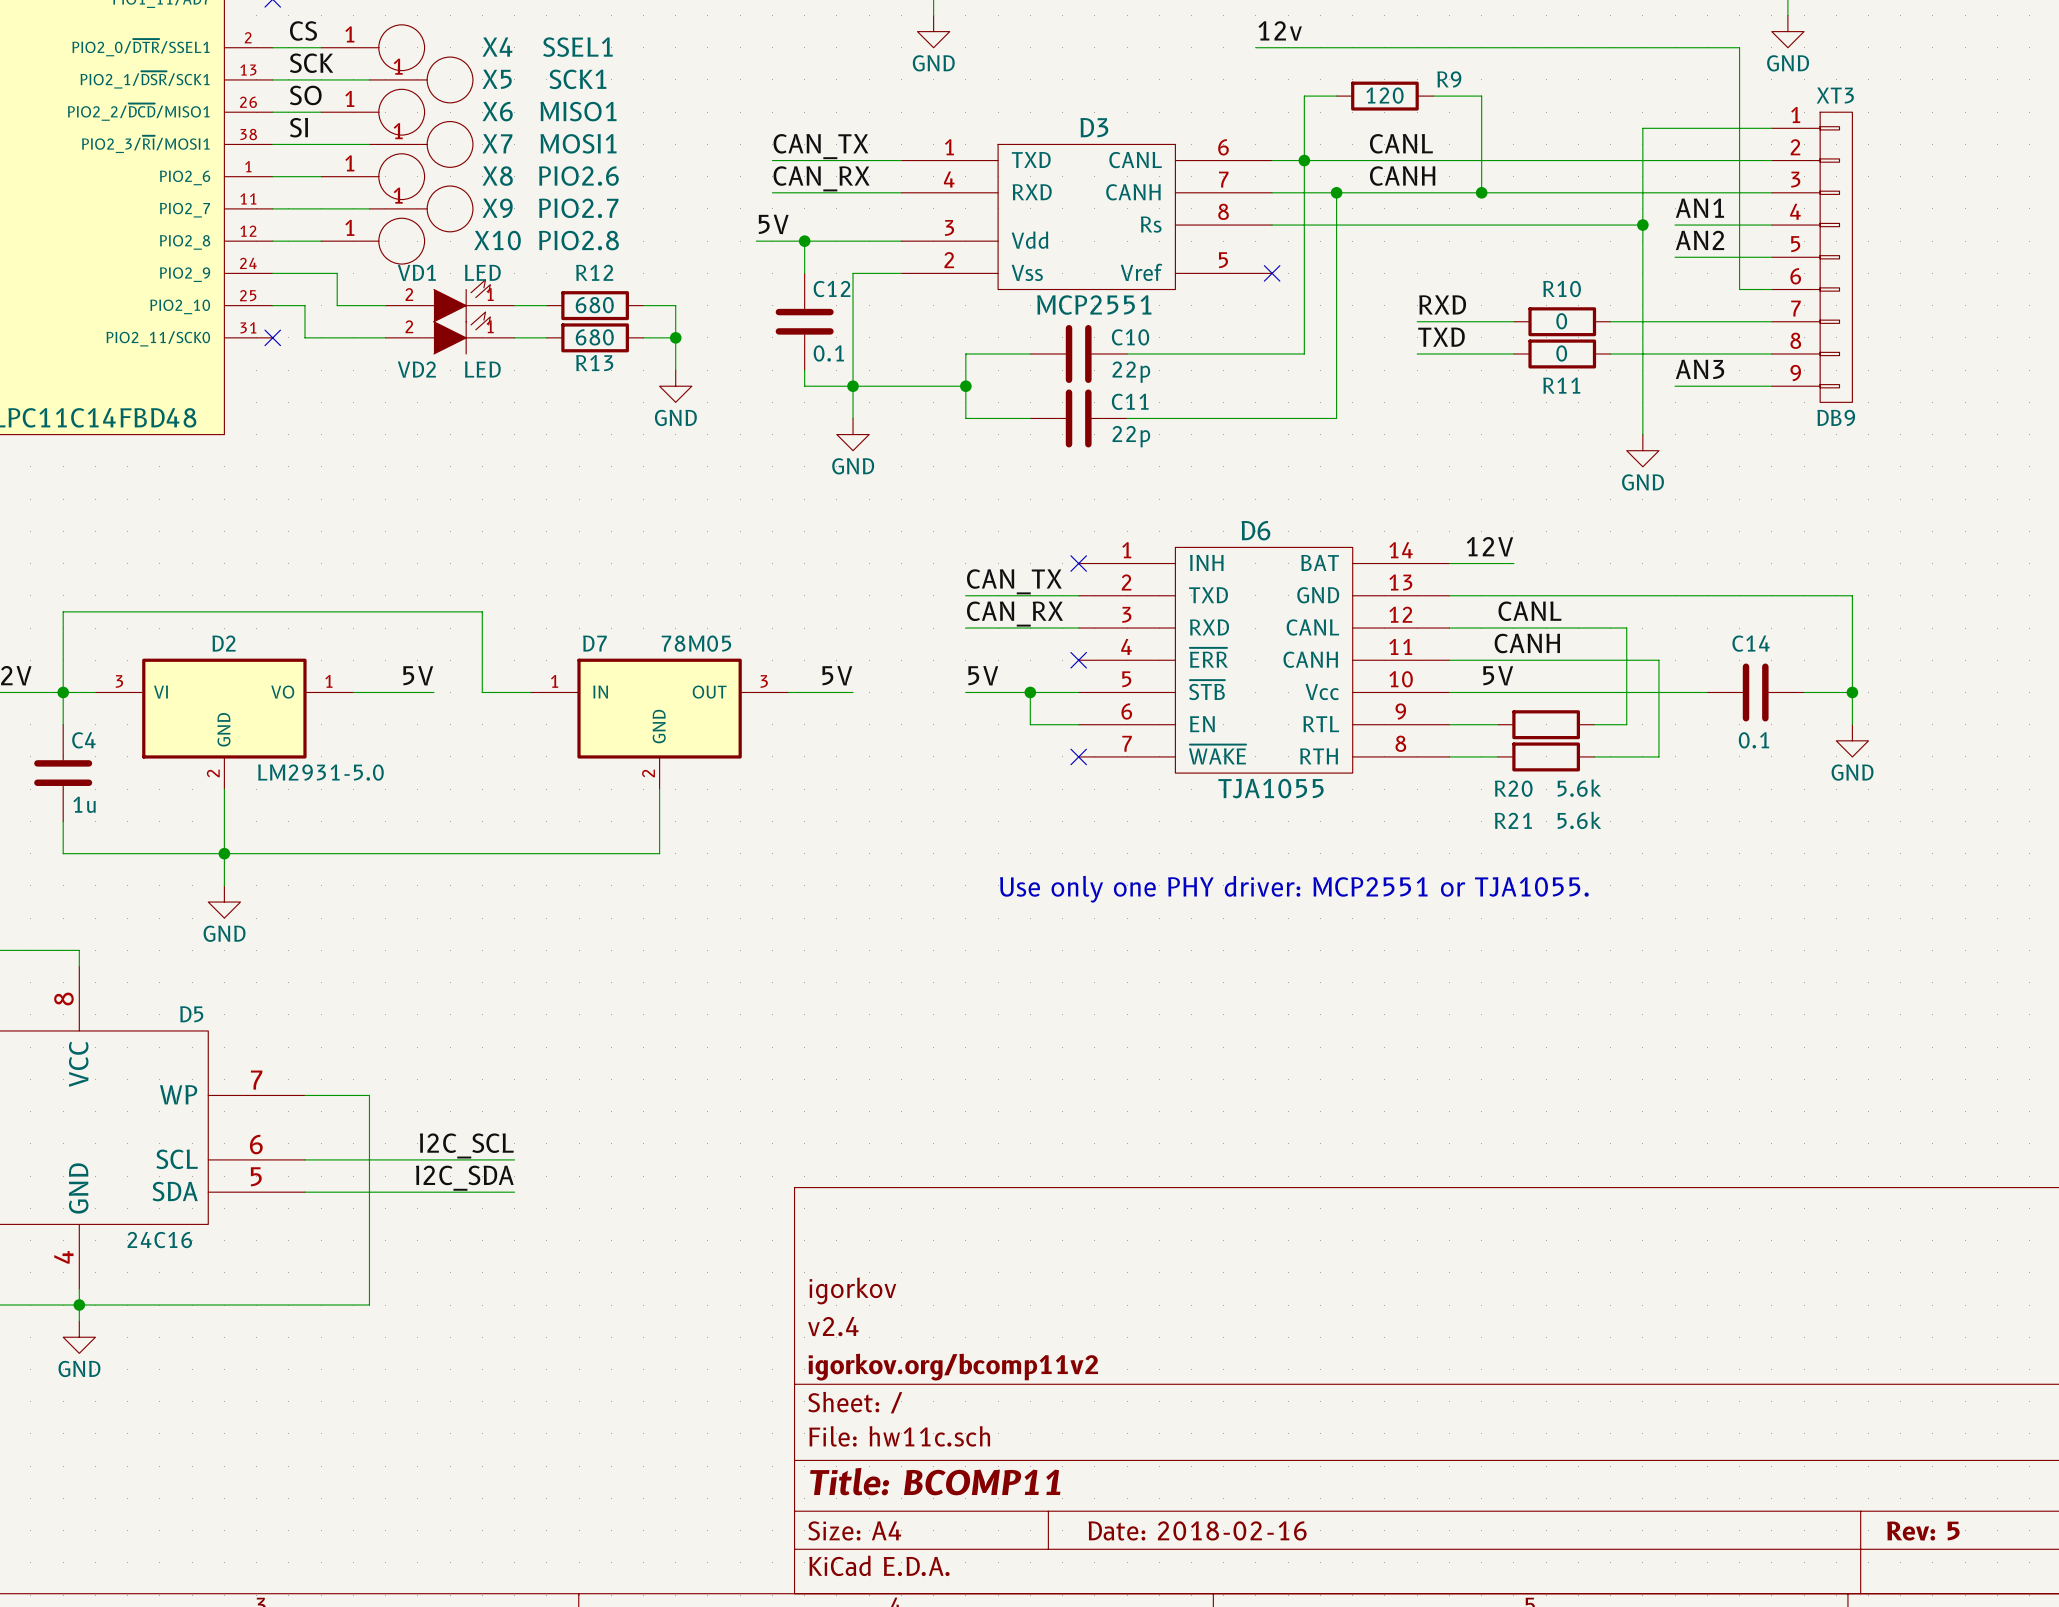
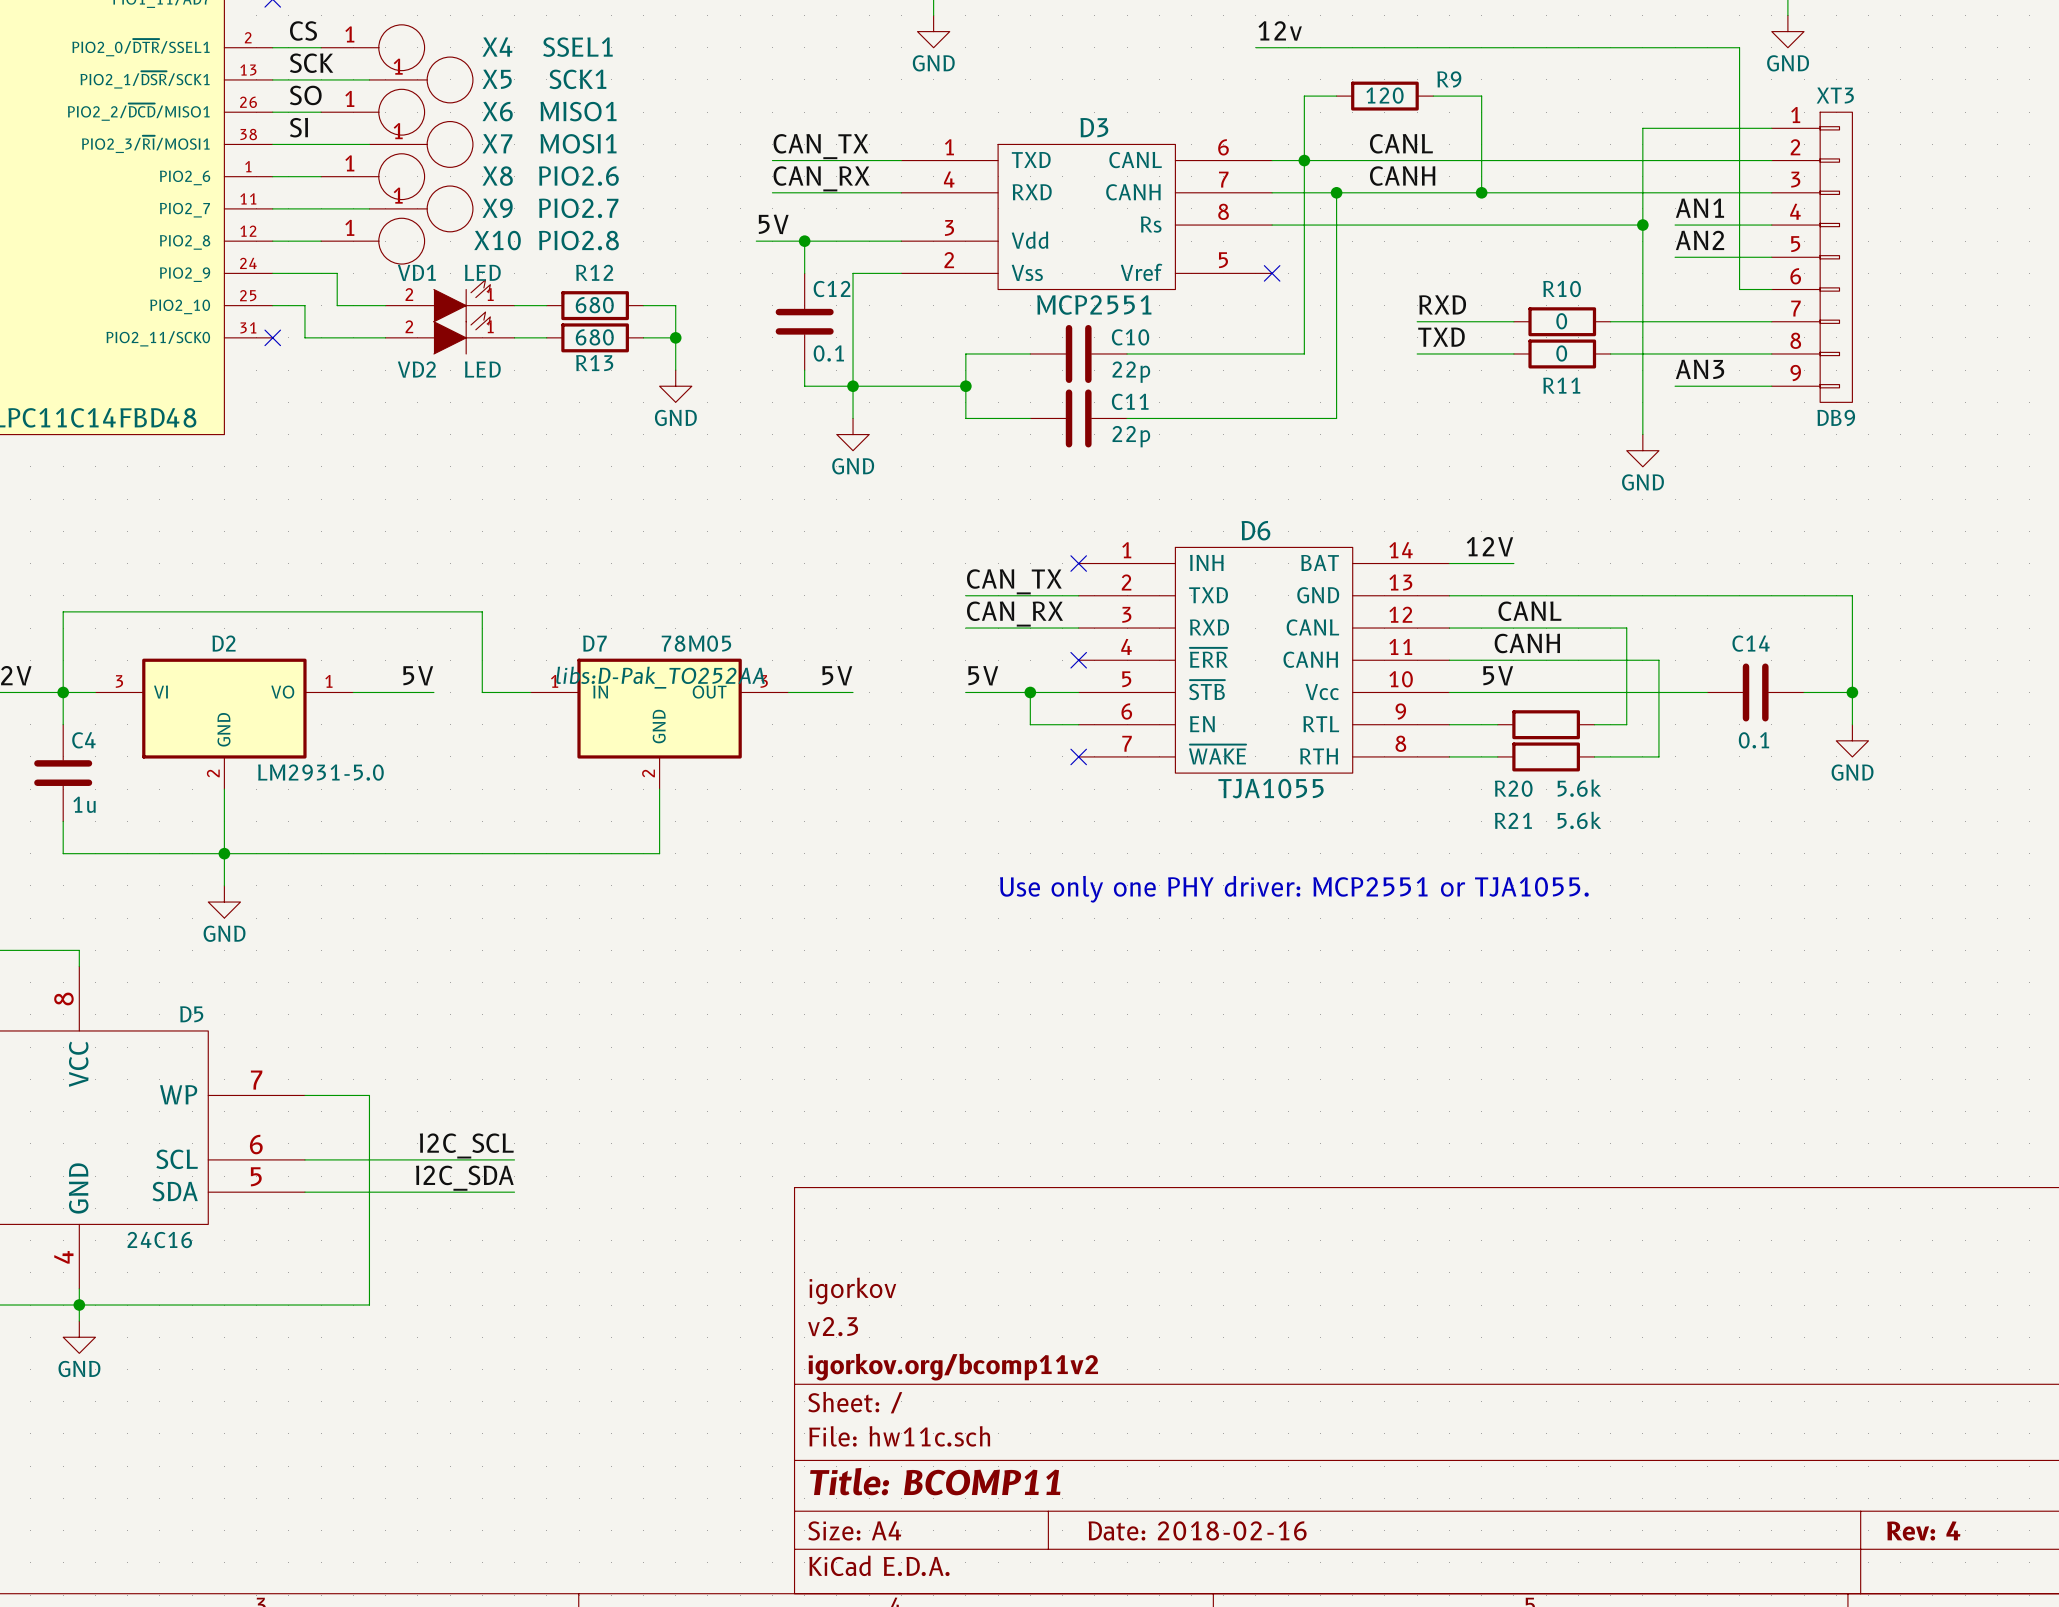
D7 text: none -> libs:D-Pak_TO252AA (660, 677)
title block: v2.4 (833, 1326) -> v2.3 (833, 1326)
title block: Rev: 5 (1923, 1531) -> Rev: 4 (1923, 1530)

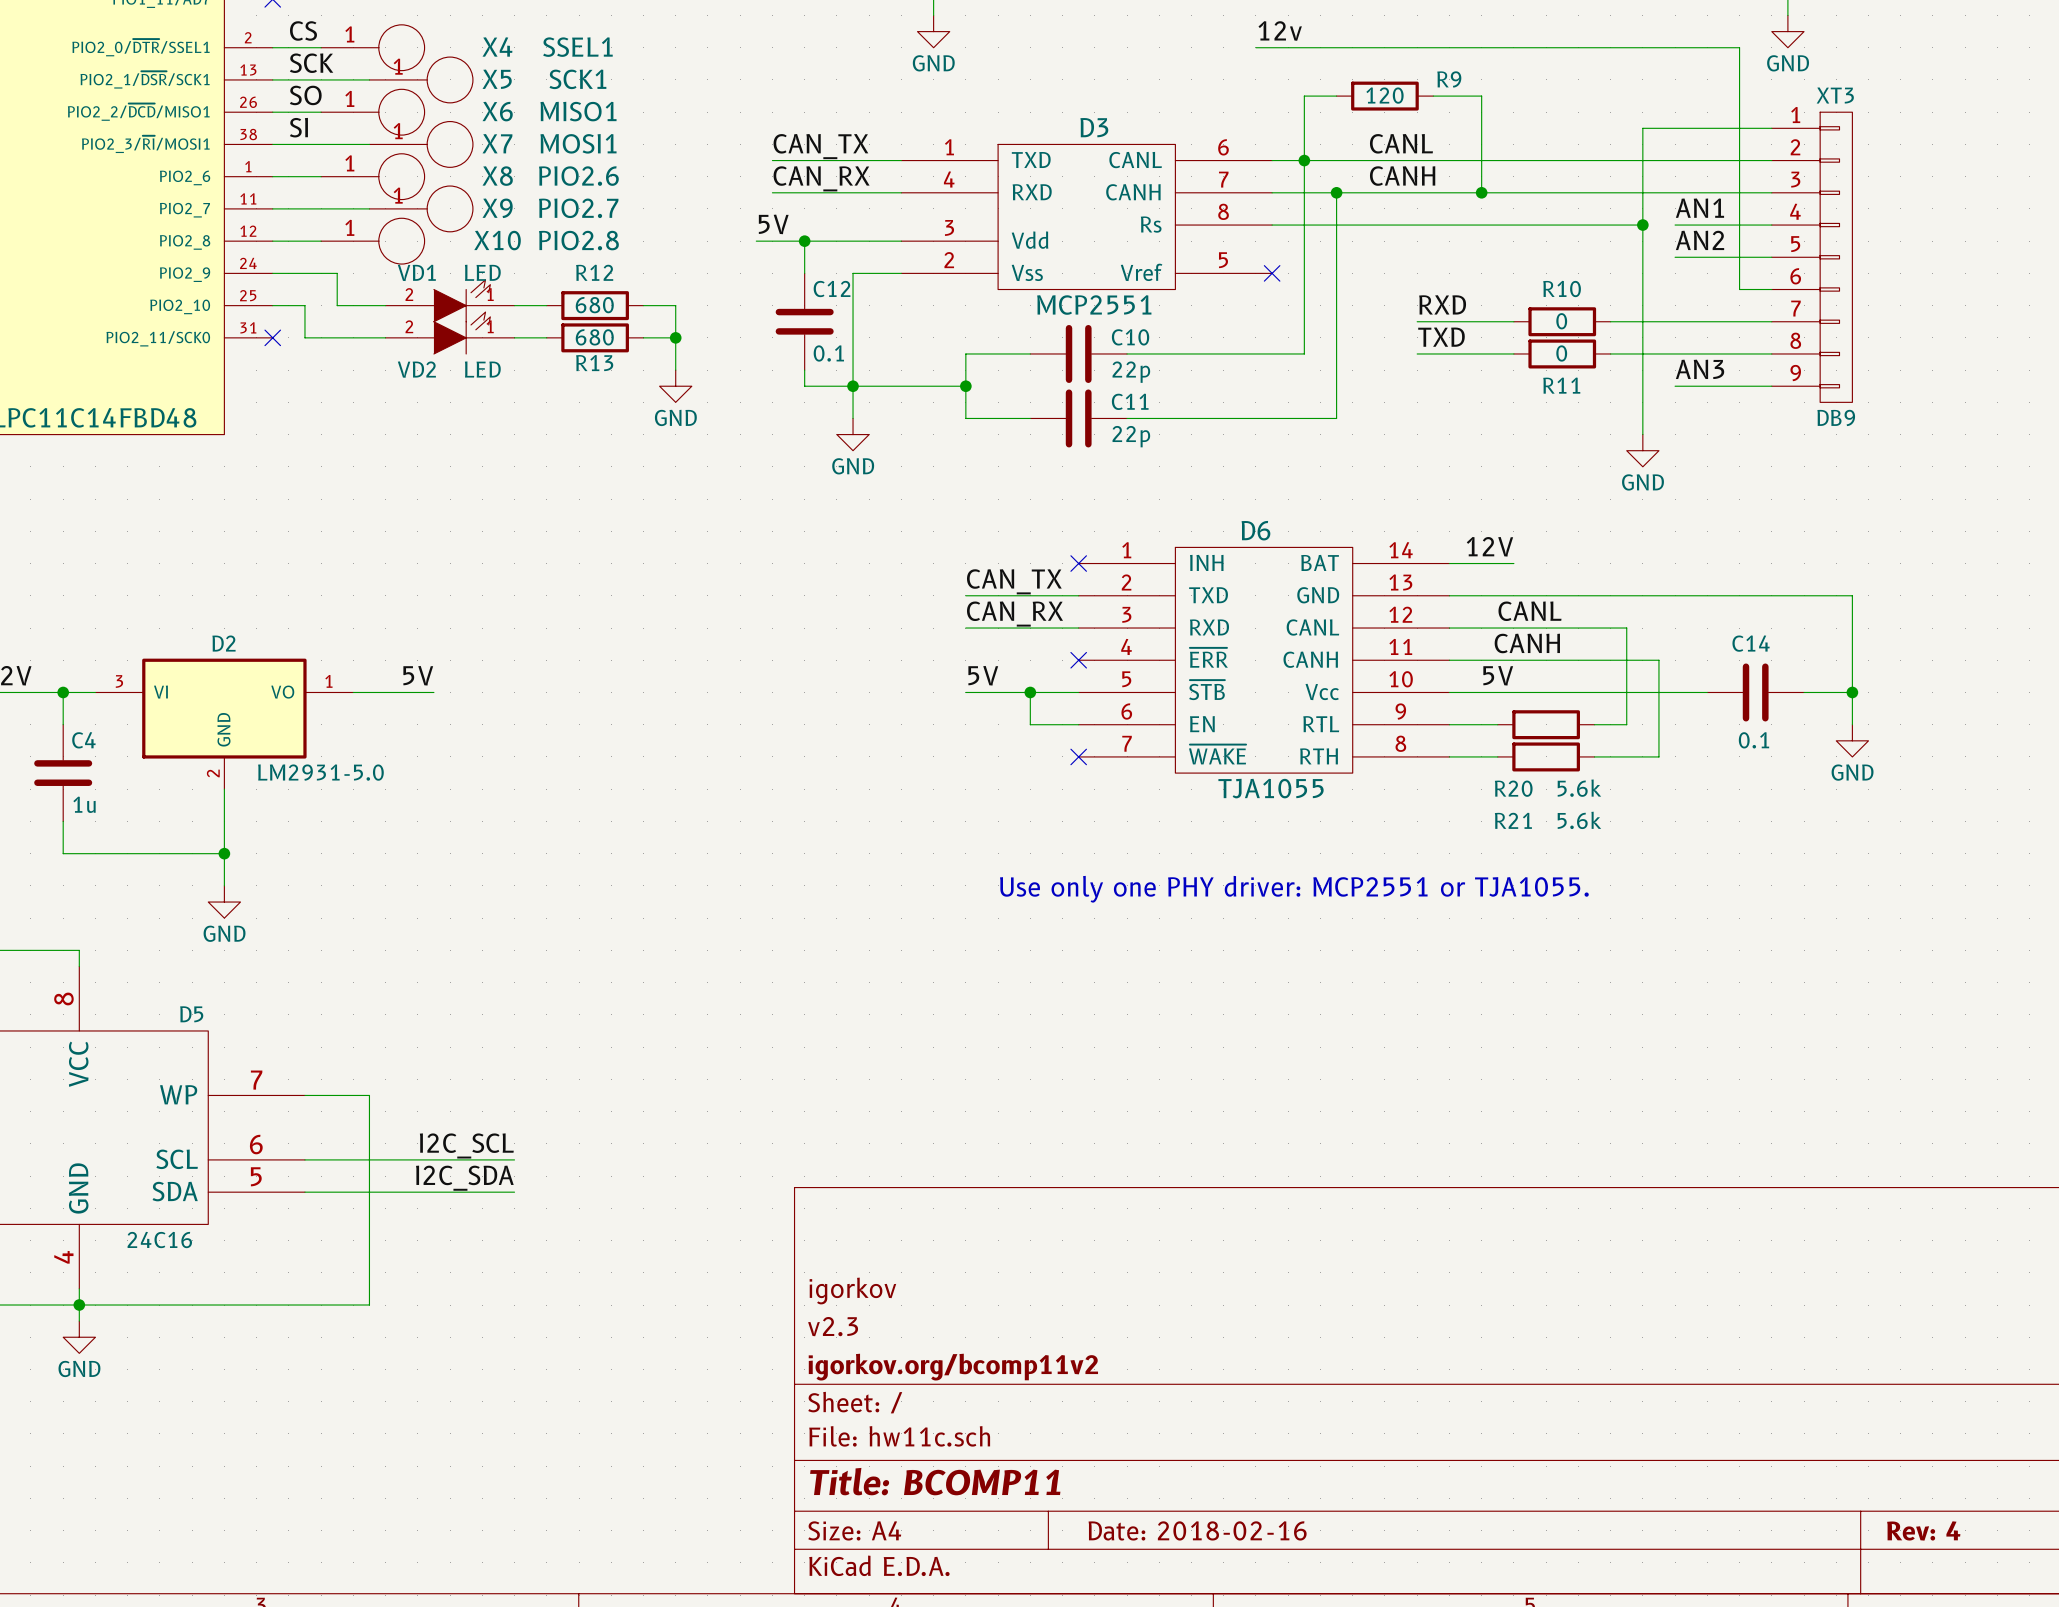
label: 5V (837, 675) -> none
wire: (63, 692) (63, 611) (482, 611) (482, 692) (530, 692) -> none
wire: (788, 692) (853, 692) -> none
D7: 78M05 (659, 723) -> none
wire: (659, 789) (659, 853) (224, 853) -> none

